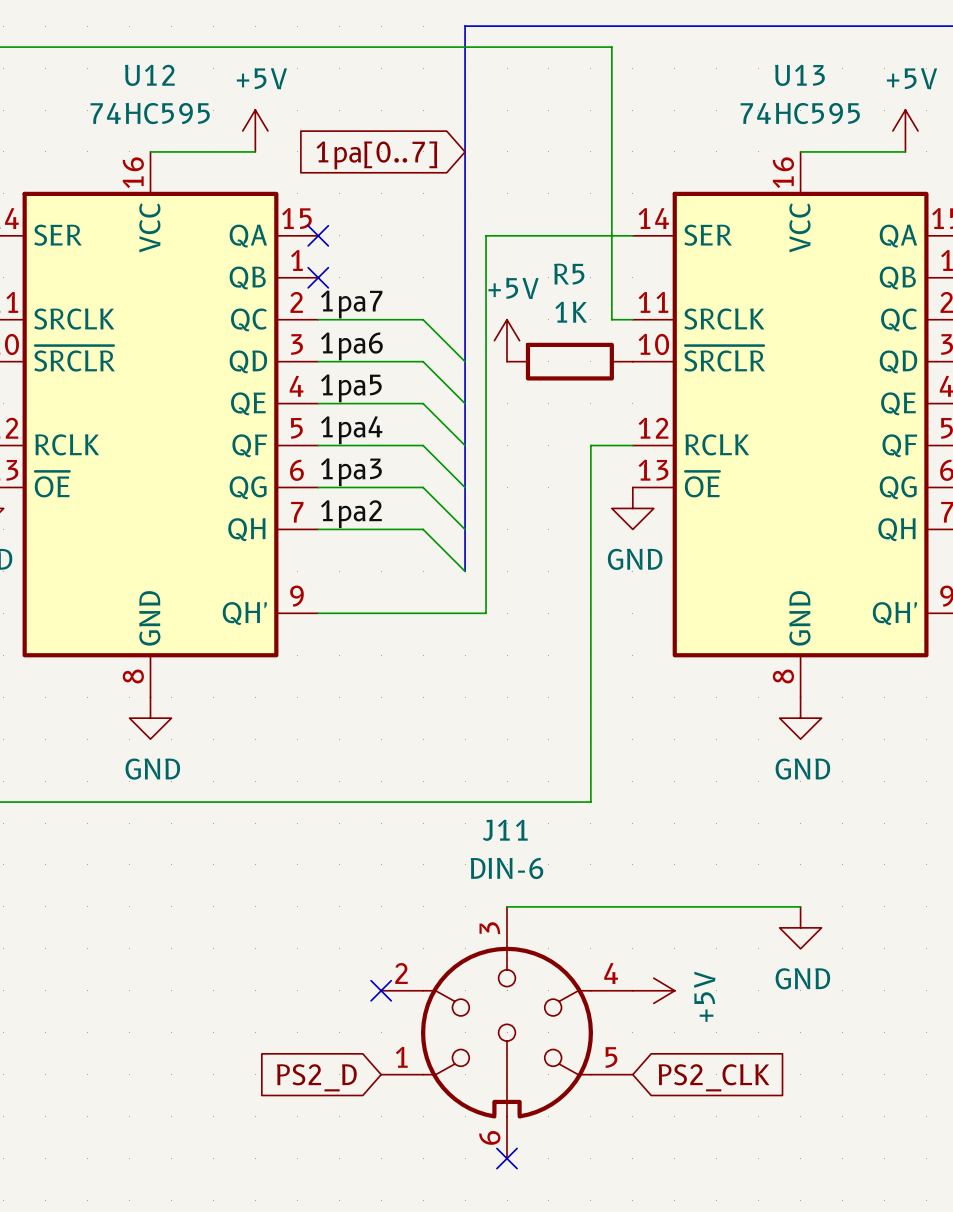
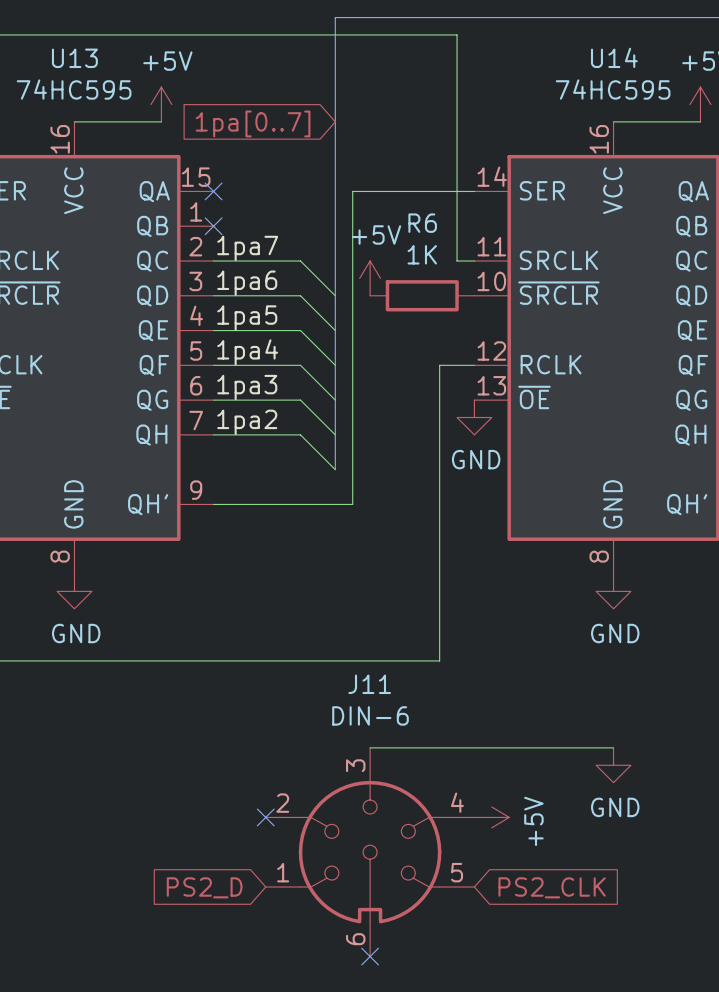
U12 name: U12 (149, 75) -> U13 (74, 58)
U13 name: U13 (799, 75) -> U14 (614, 57)
R5 name: R5 (569, 274) -> R6 (422, 223)

